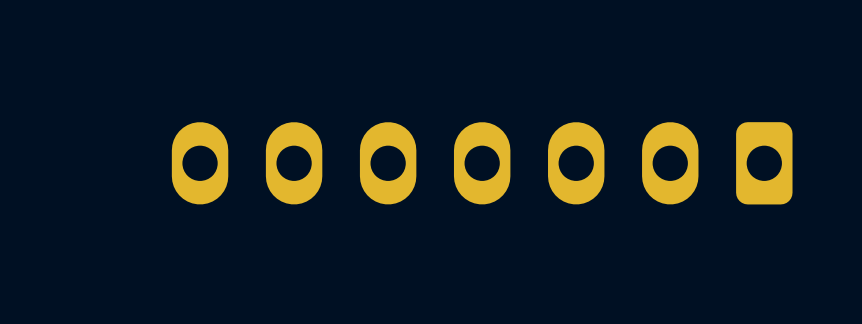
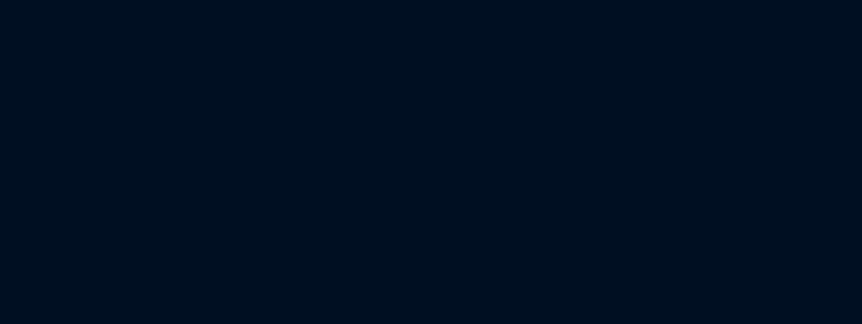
part: (482, 163) -> none

